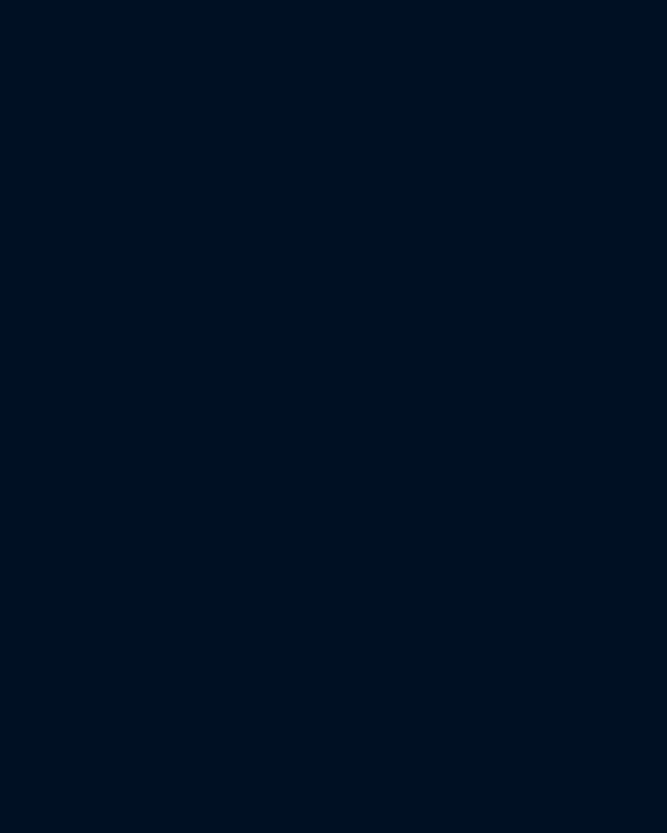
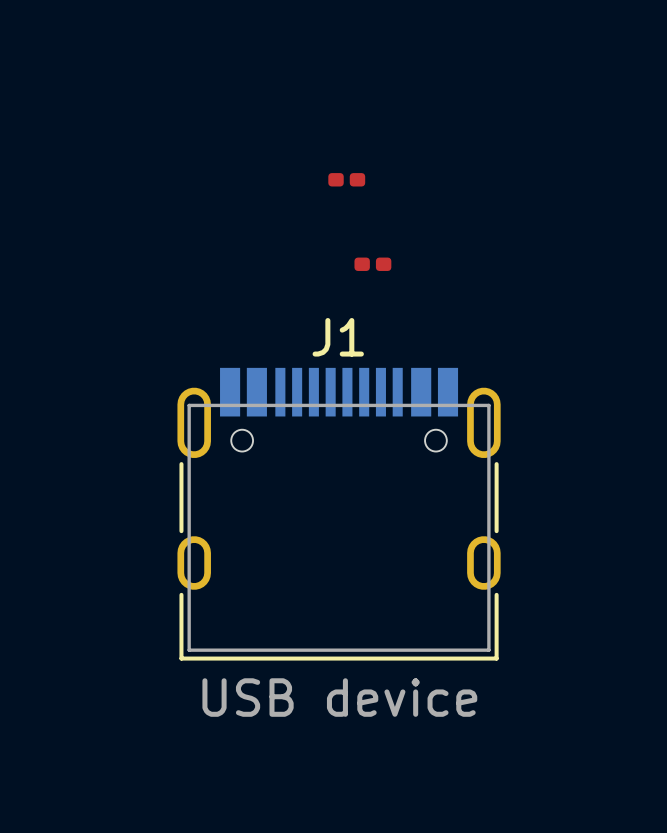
part: none -> (346, 179)
part: none -> (372, 264)
J1: none -> USB device (339, 514)

